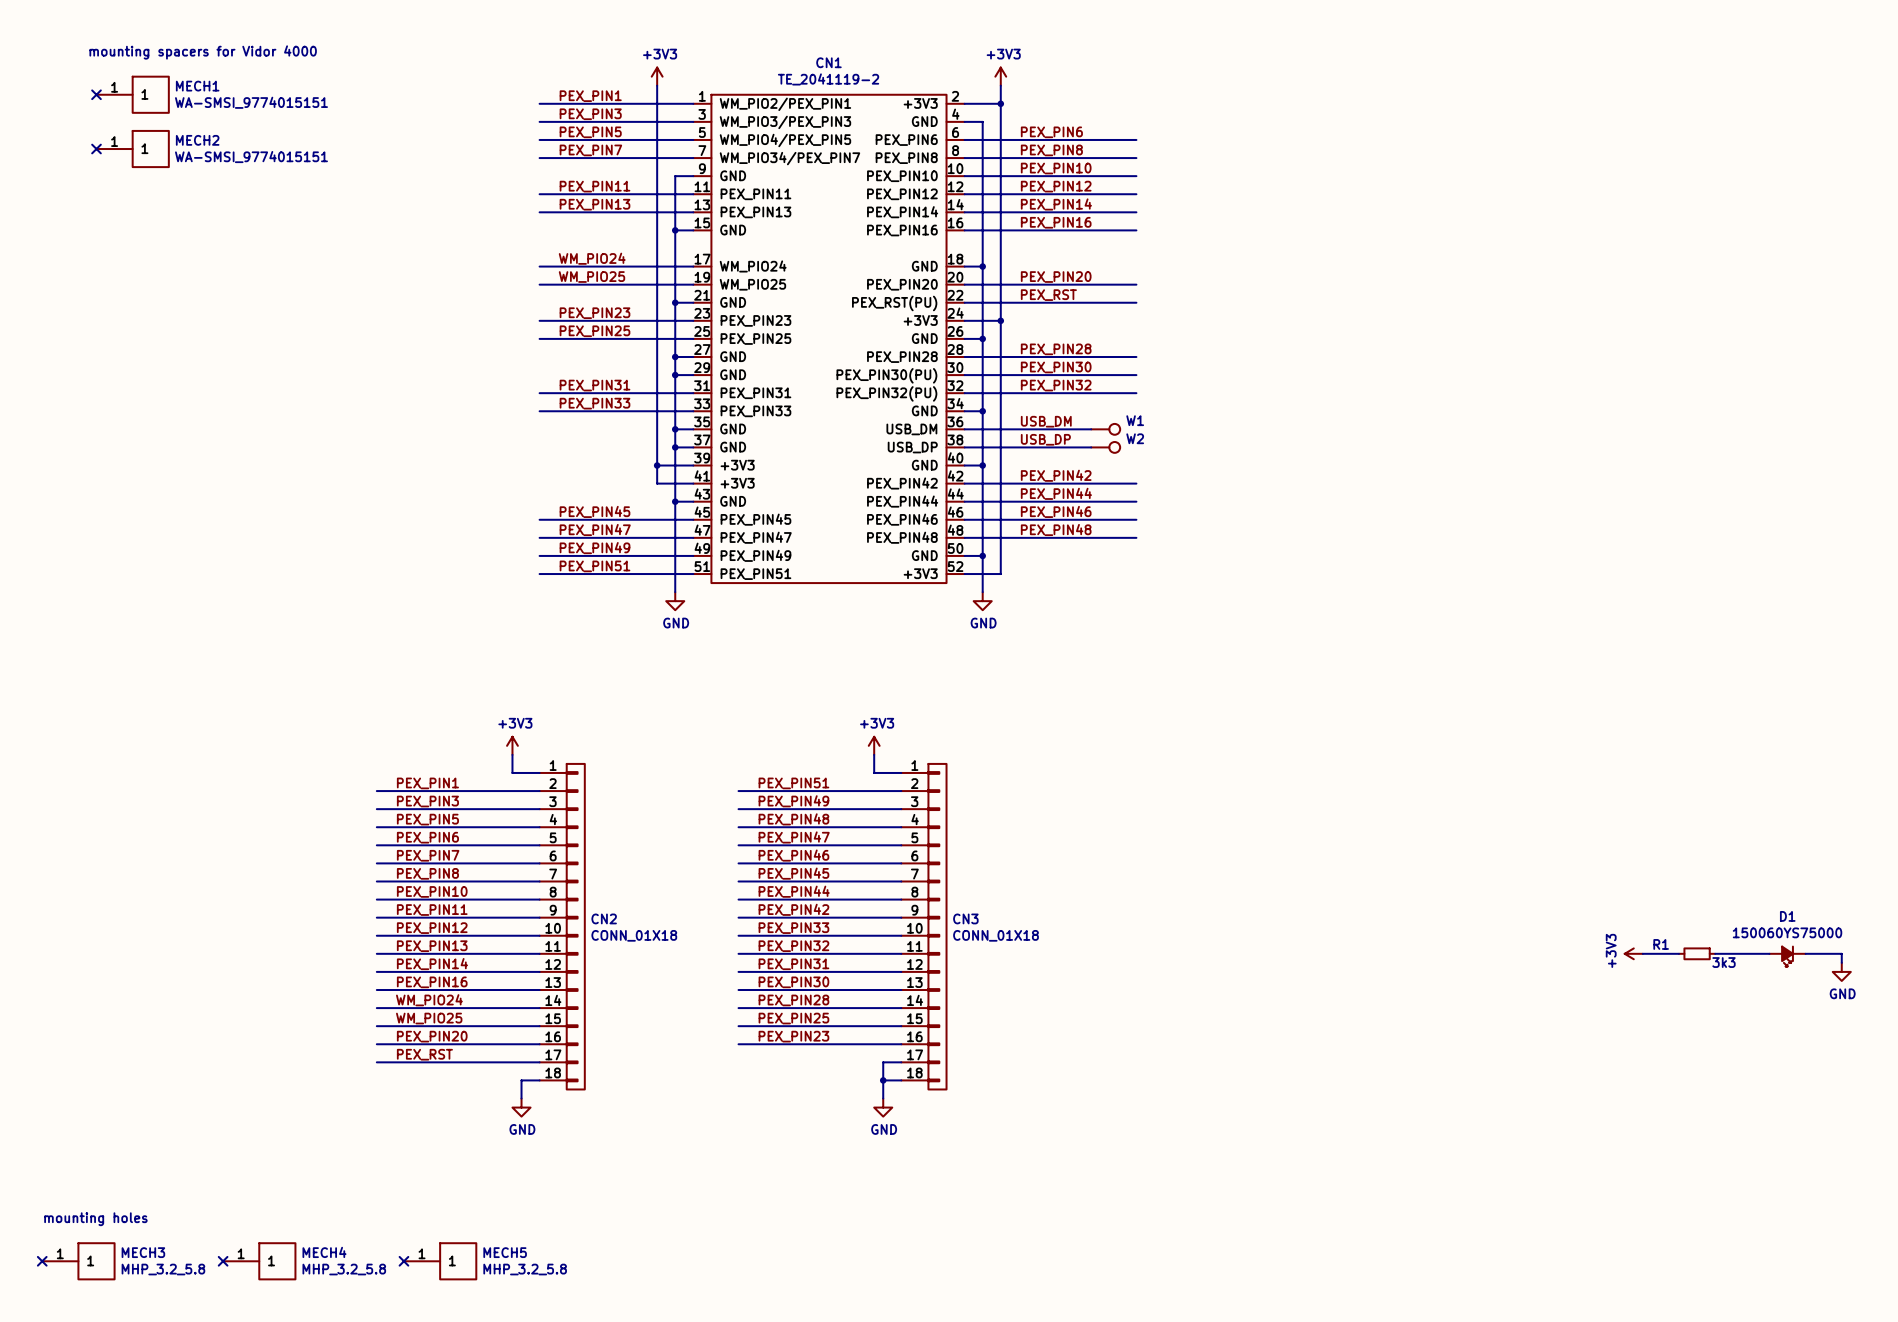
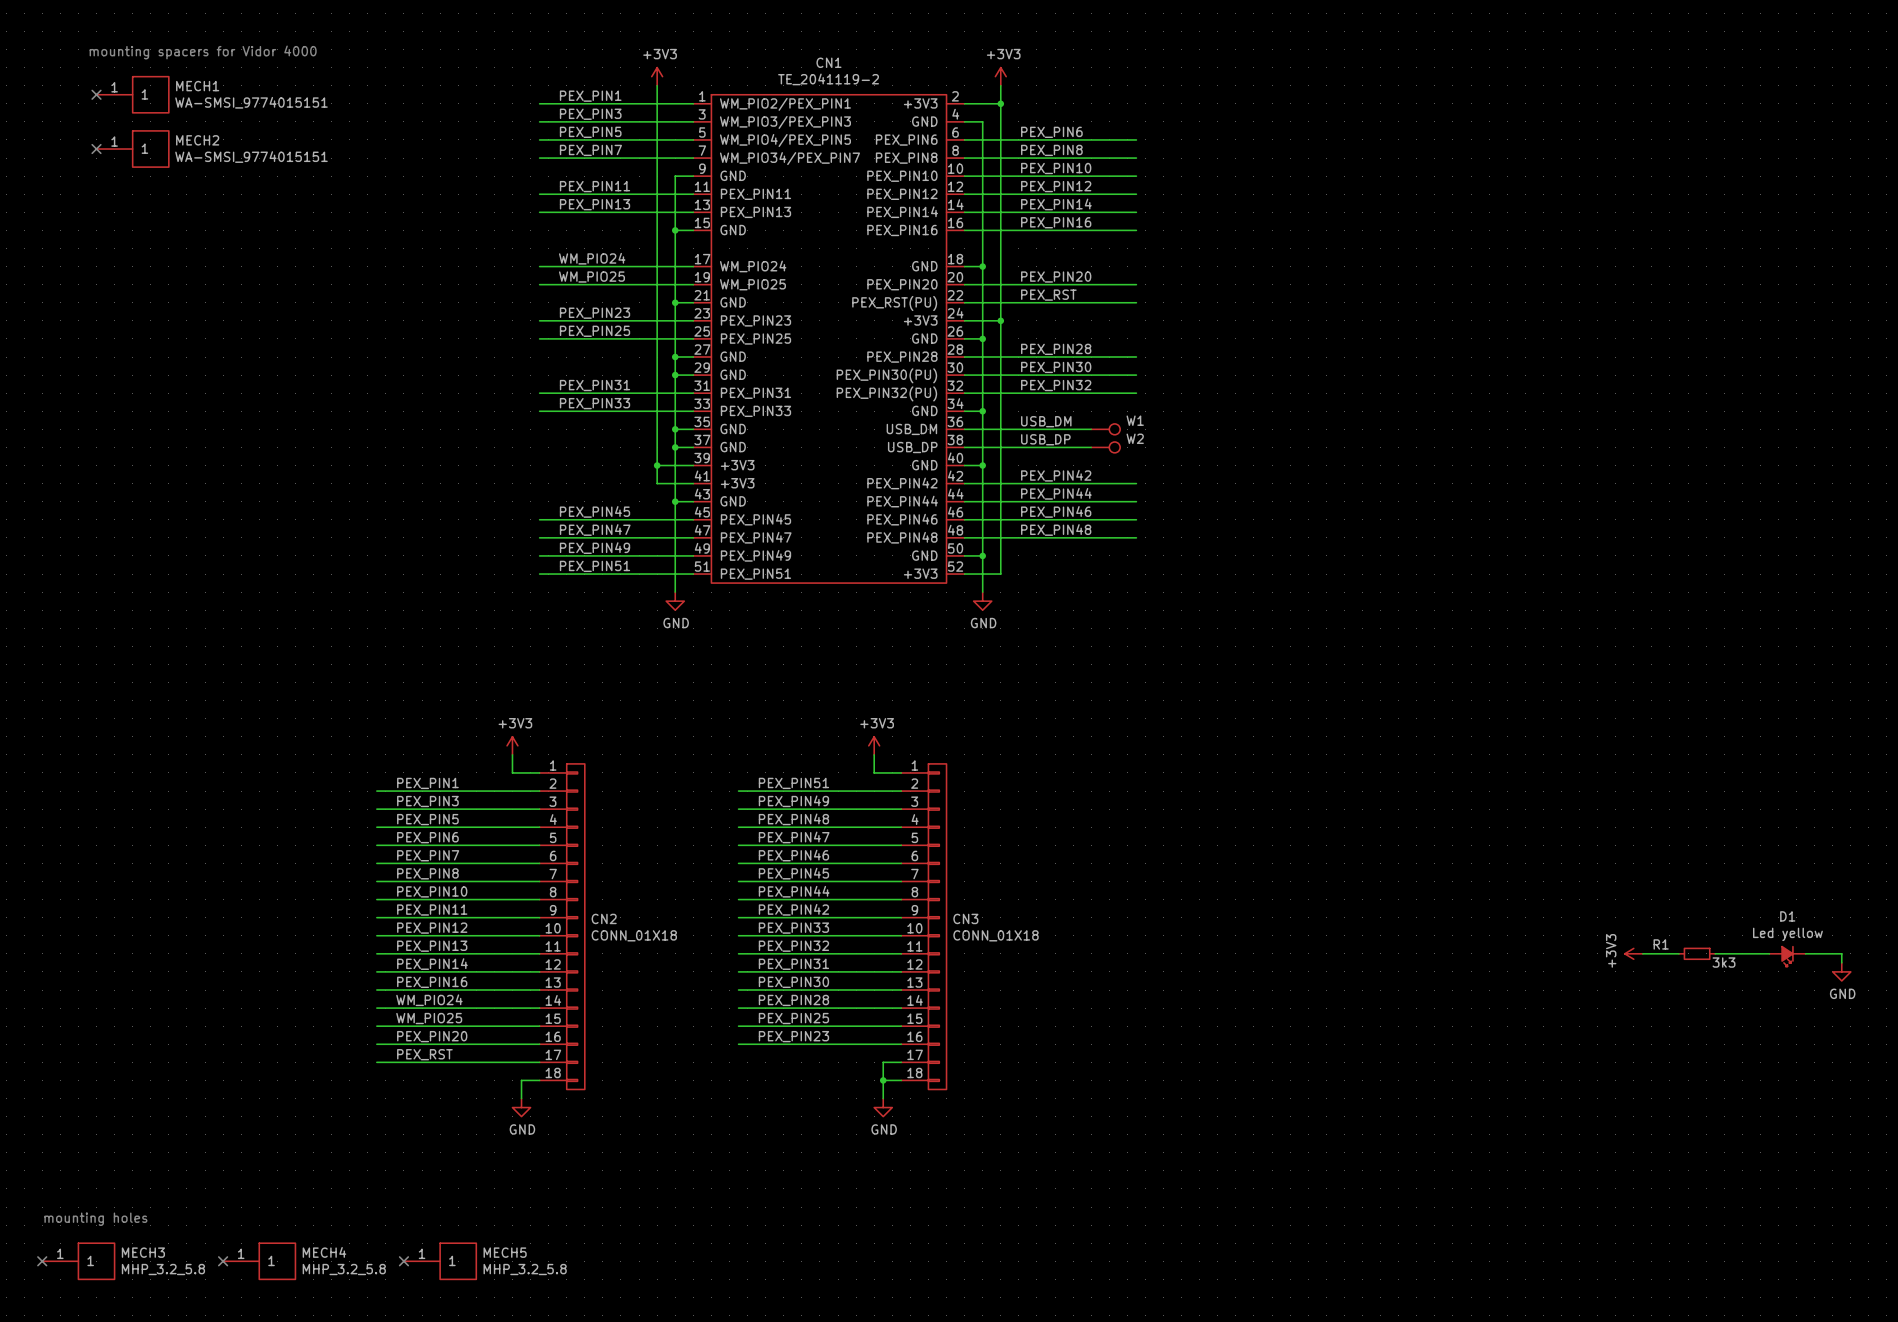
D1 value: 150060YS75000 (1787, 932) -> Led yellow (1787, 934)

